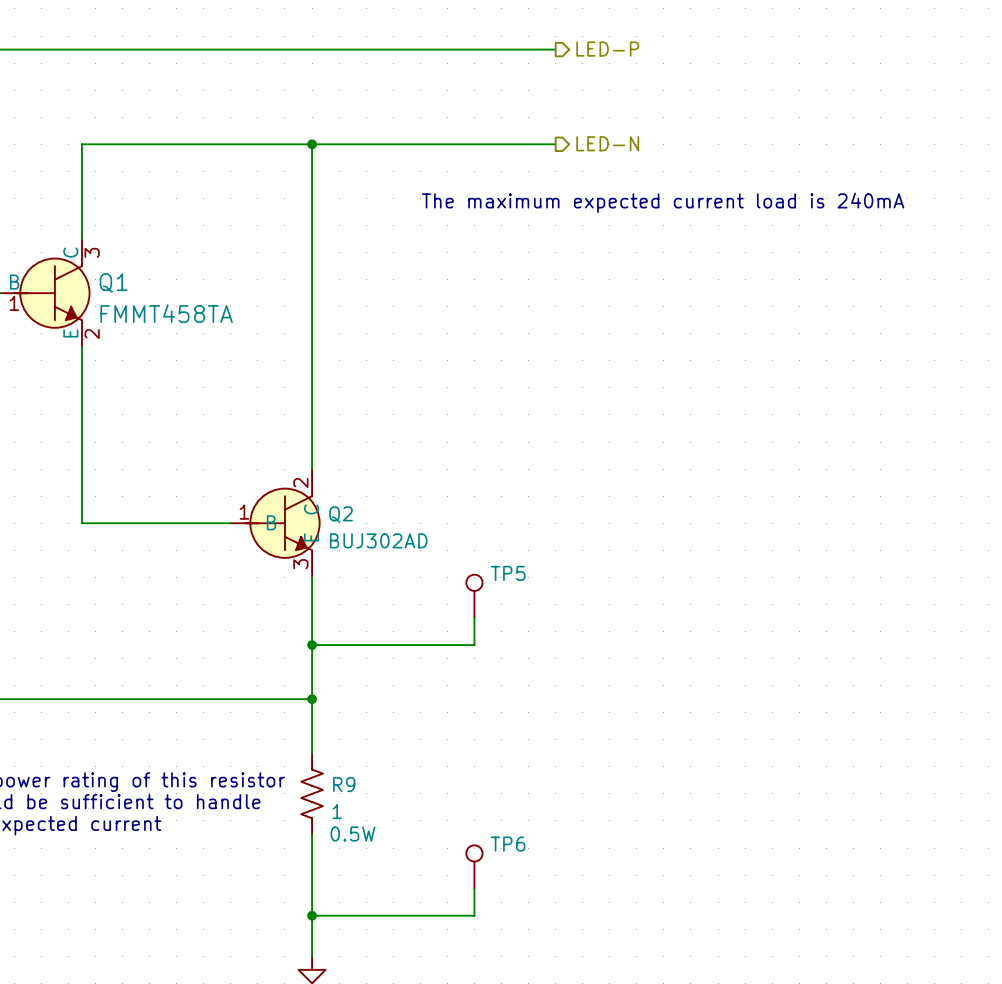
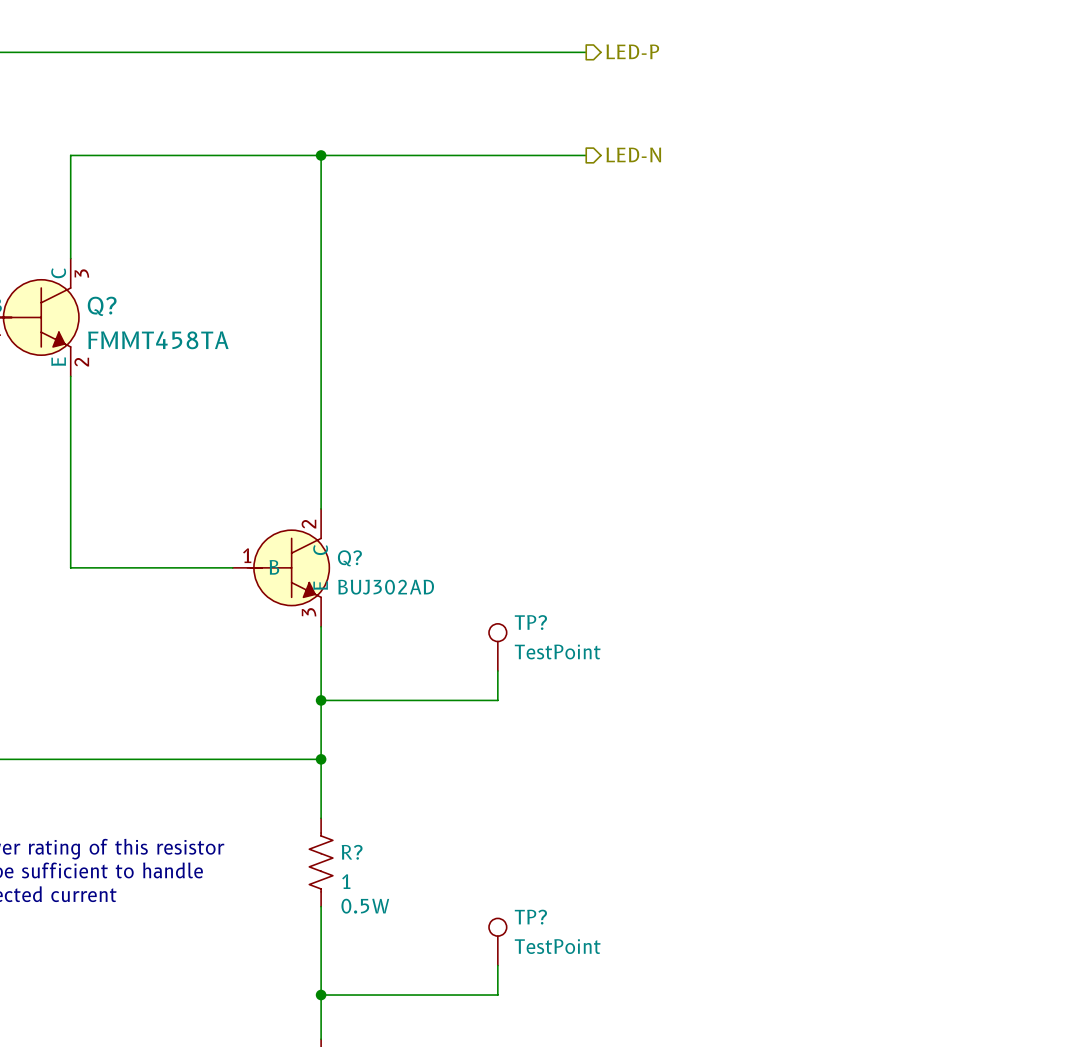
text: The maximum expected current load is 240mA (663, 202) -> none
Q1 name: Q1 (113, 282) -> Q? (102, 306)
Q2 name: Q2 (341, 514) -> Q? (349, 558)
TP5 name: TP5 (508, 573) -> TP? (530, 622)
TP5 value: none -> TestPoint (557, 651)
R9 name: R9 (344, 784) -> R? (352, 852)
TP6 name: TP6 (508, 844) -> TP? (530, 917)
TP6 value: none -> TestPoint (557, 946)

